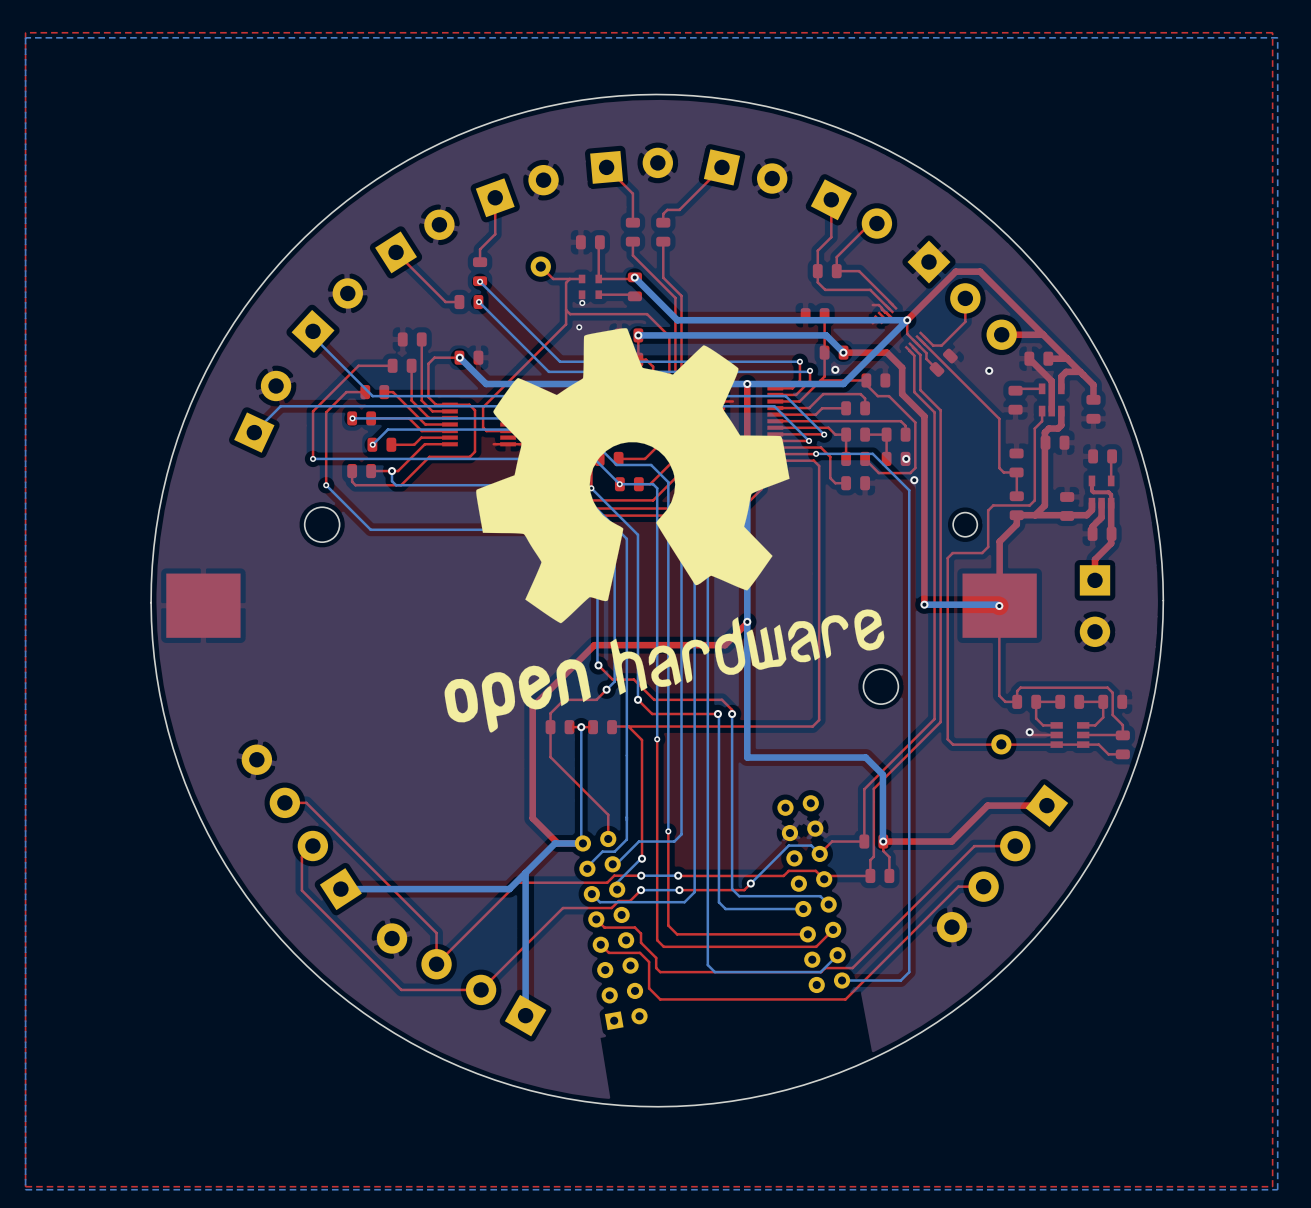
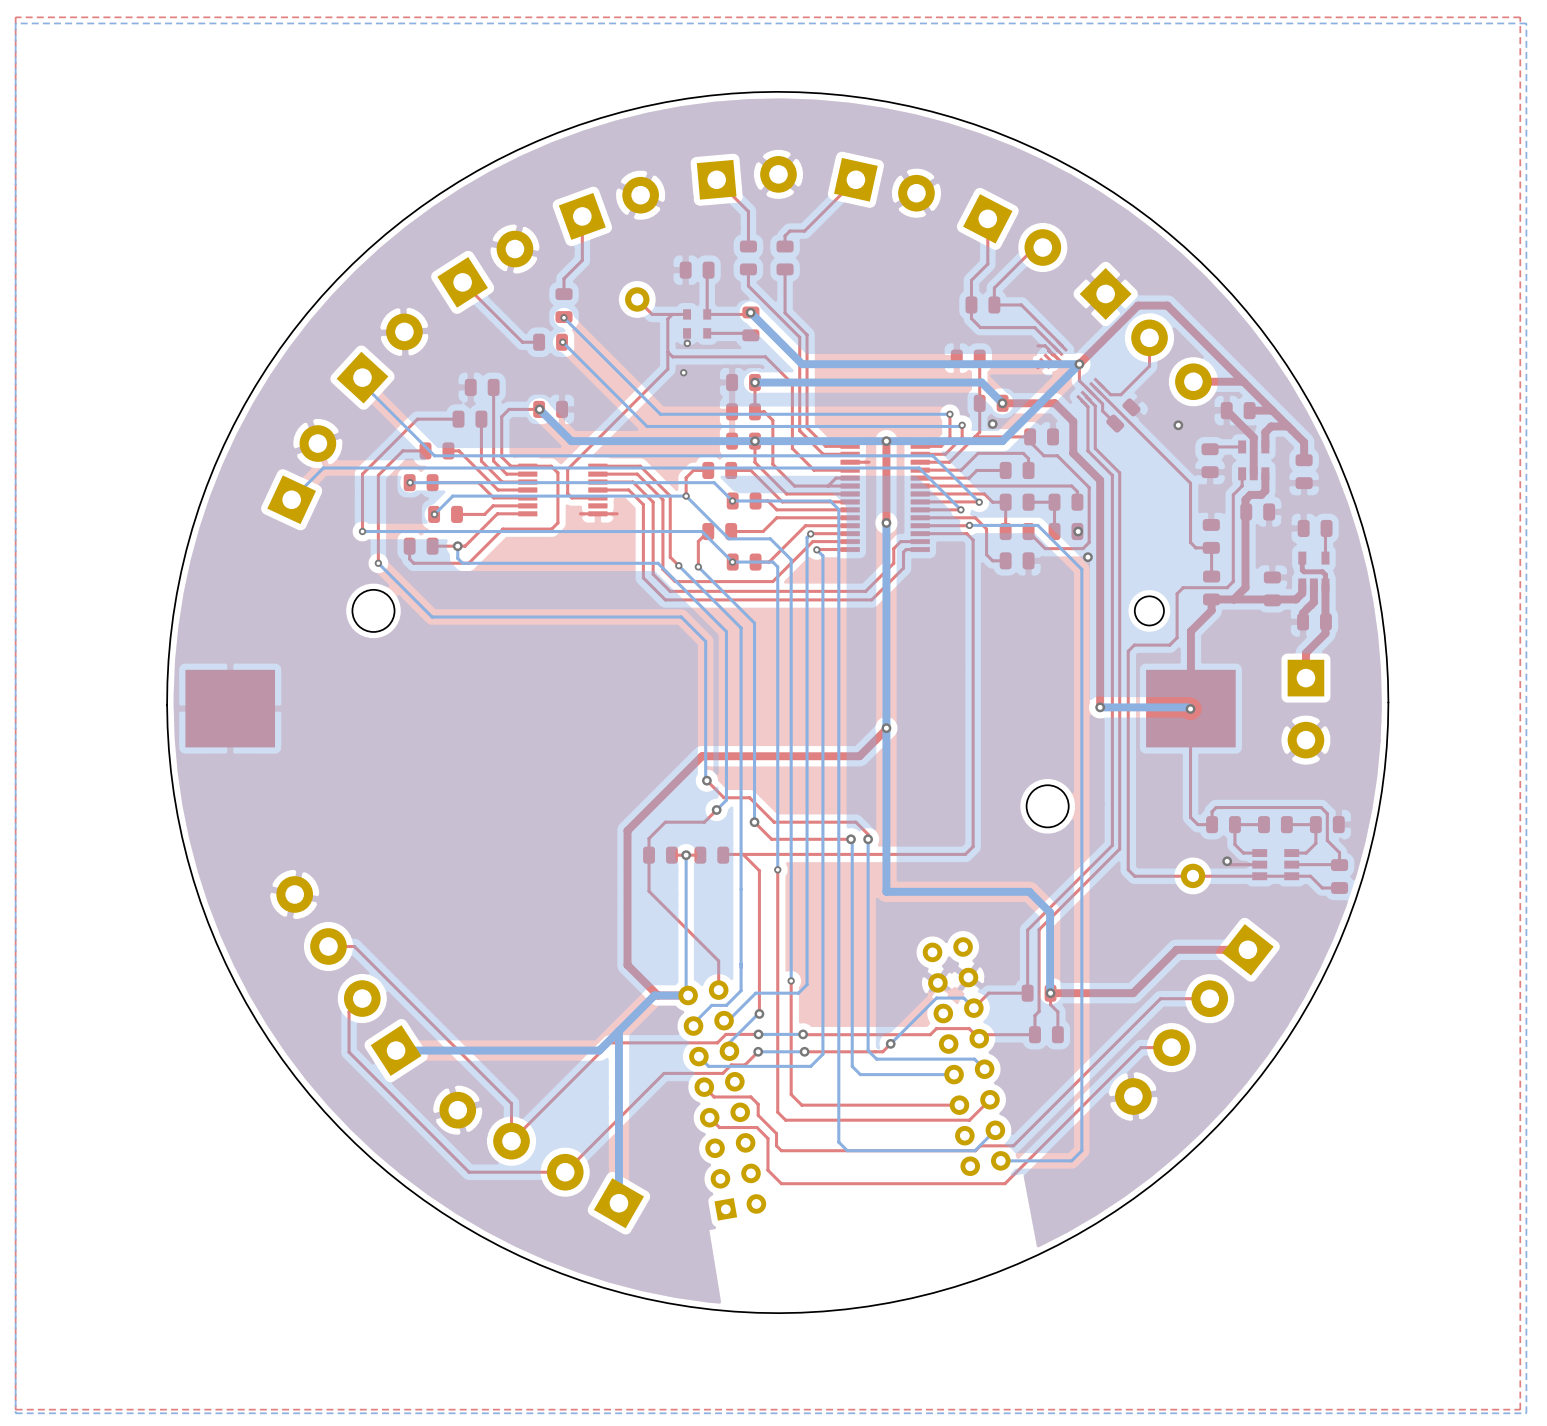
drawing: [444, 328, 885, 733] -> none

